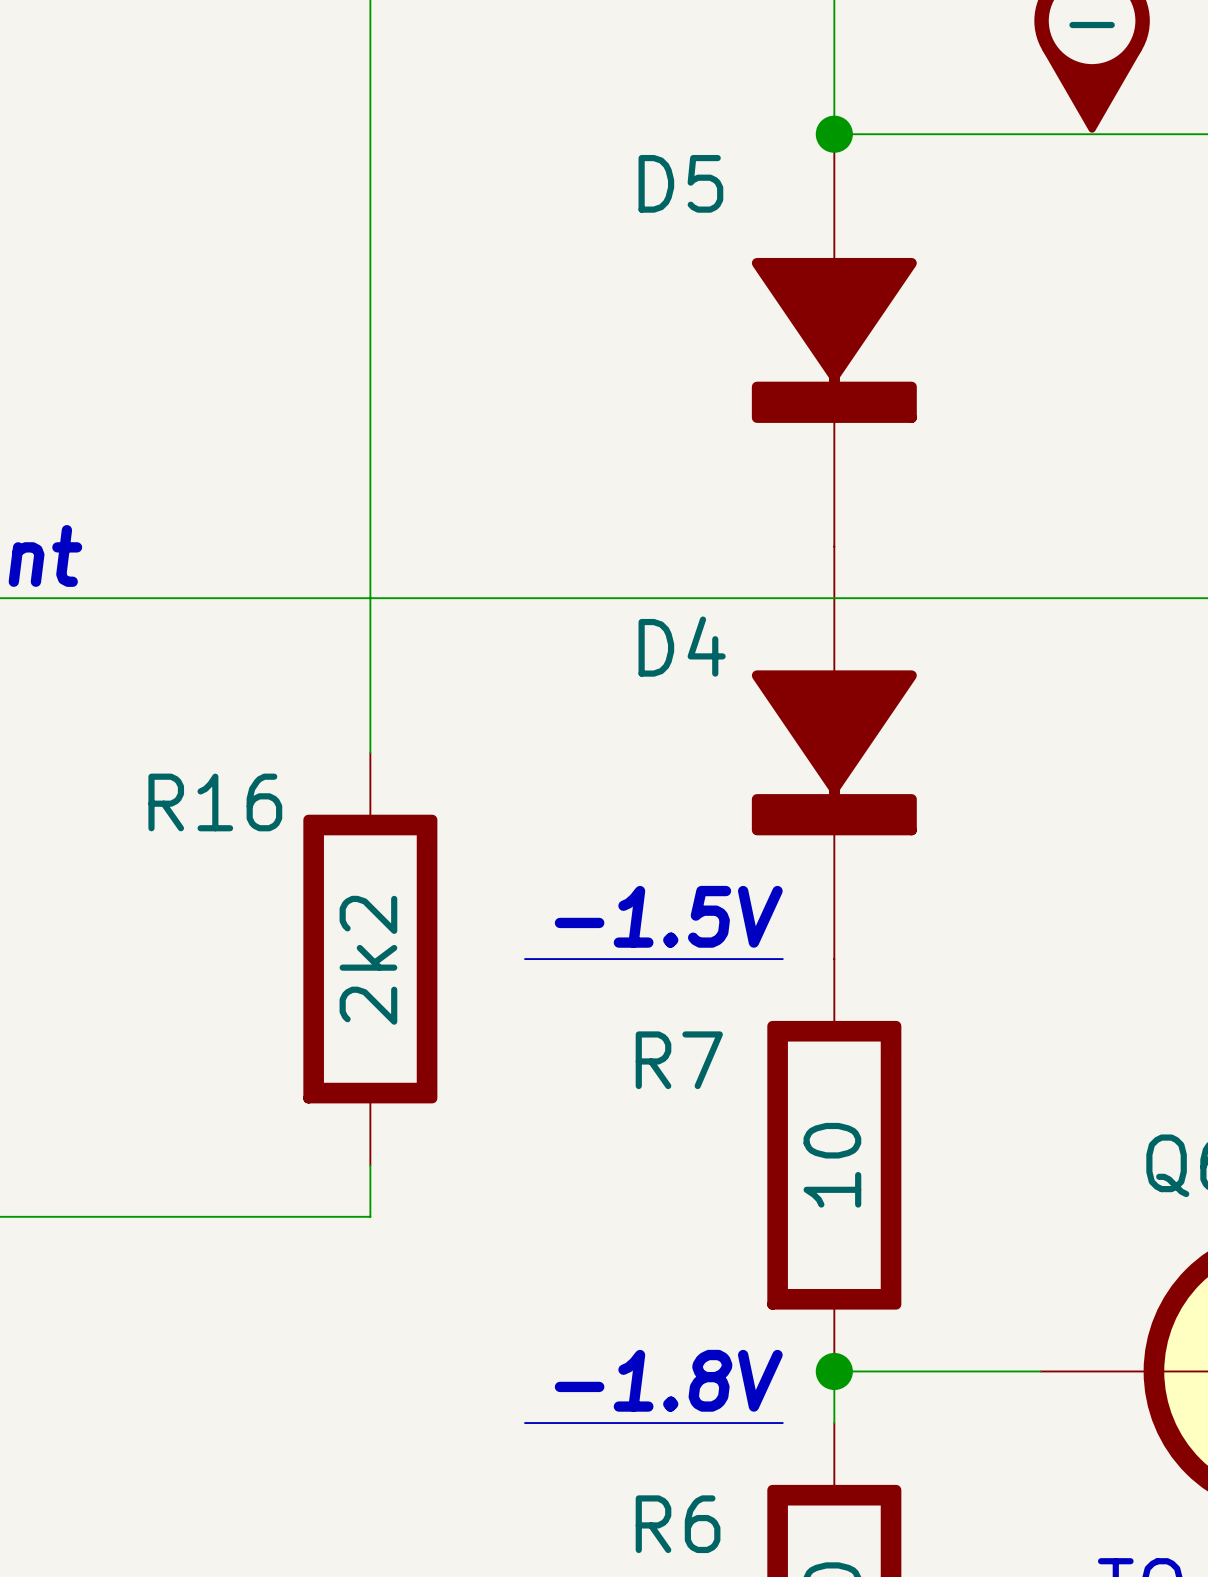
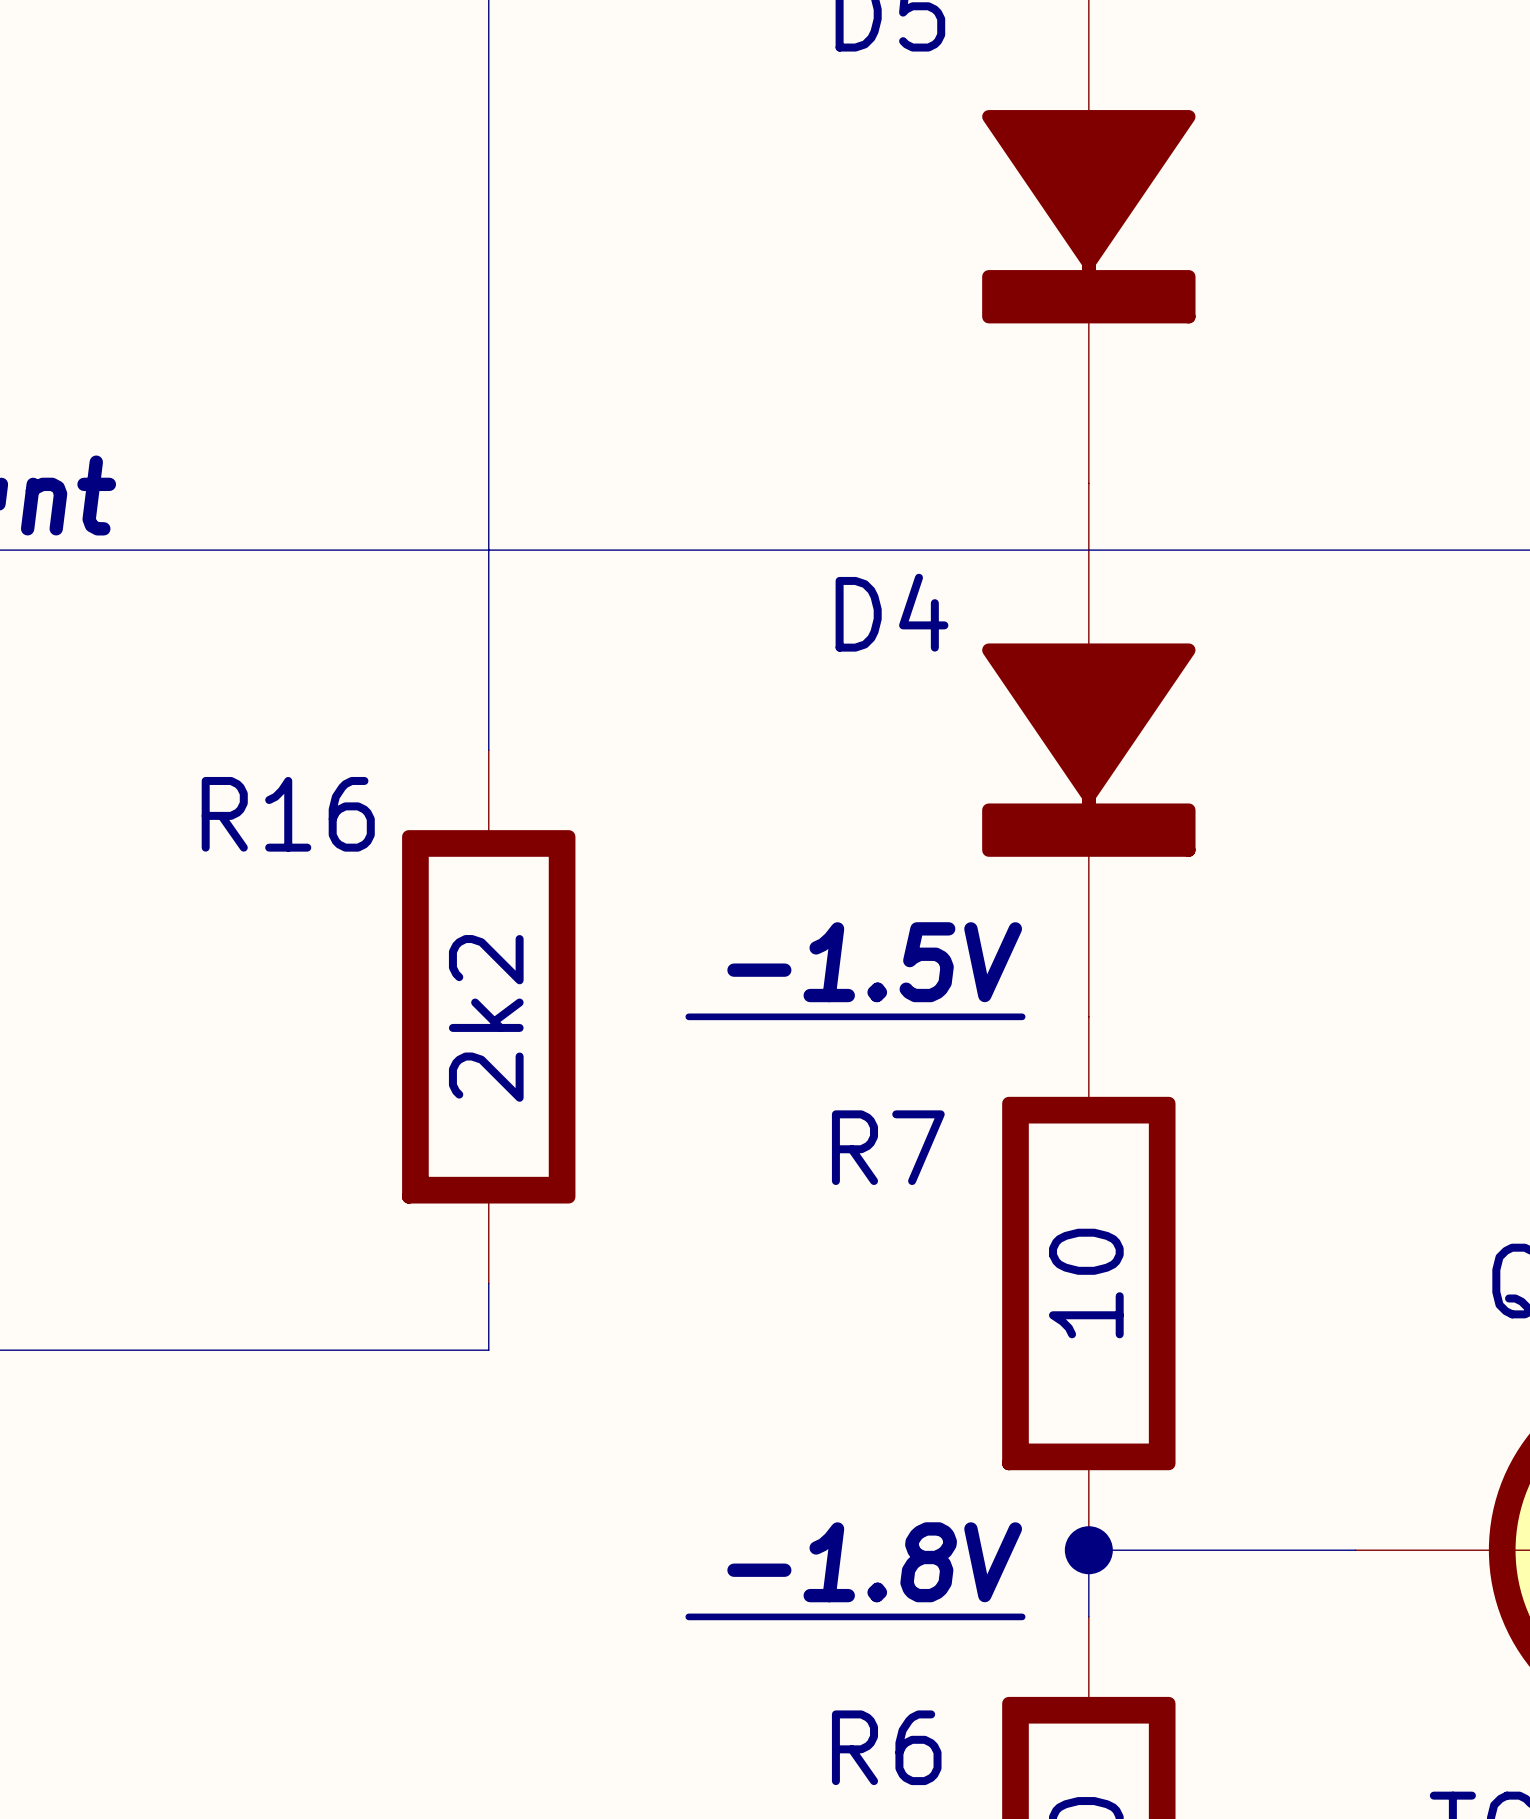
line width: thin (525, 959) (782, 959) -> thick (688, 1016) (1022, 1016)
line width: thin (525, 1423) (782, 1423) -> thick (688, 1616) (1022, 1616)

